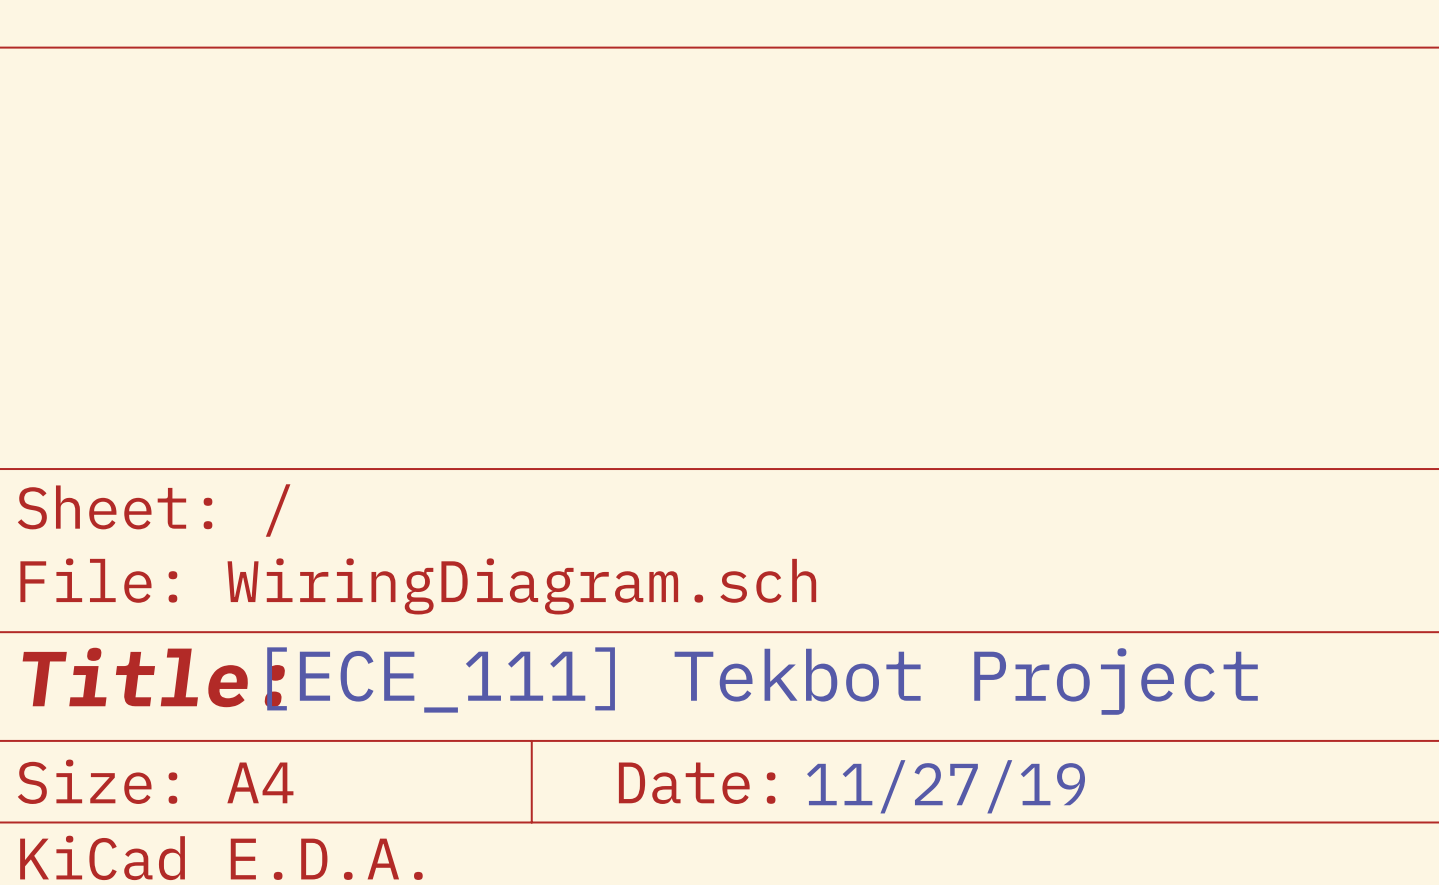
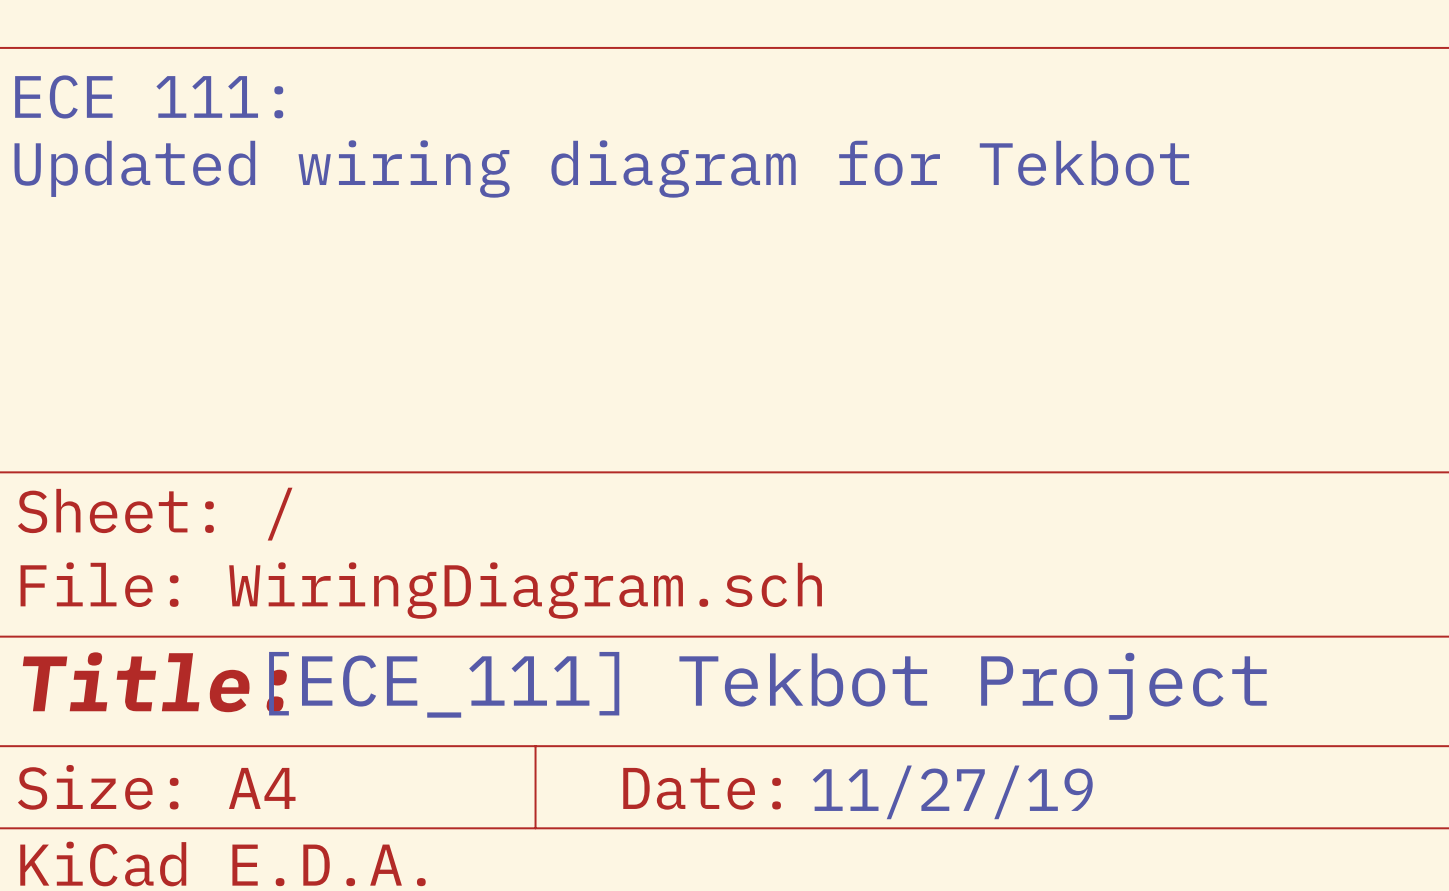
text: none -> ECE 111: (149, 96)
text: none -> Updated wiring diagram for Tekbot (601, 168)

